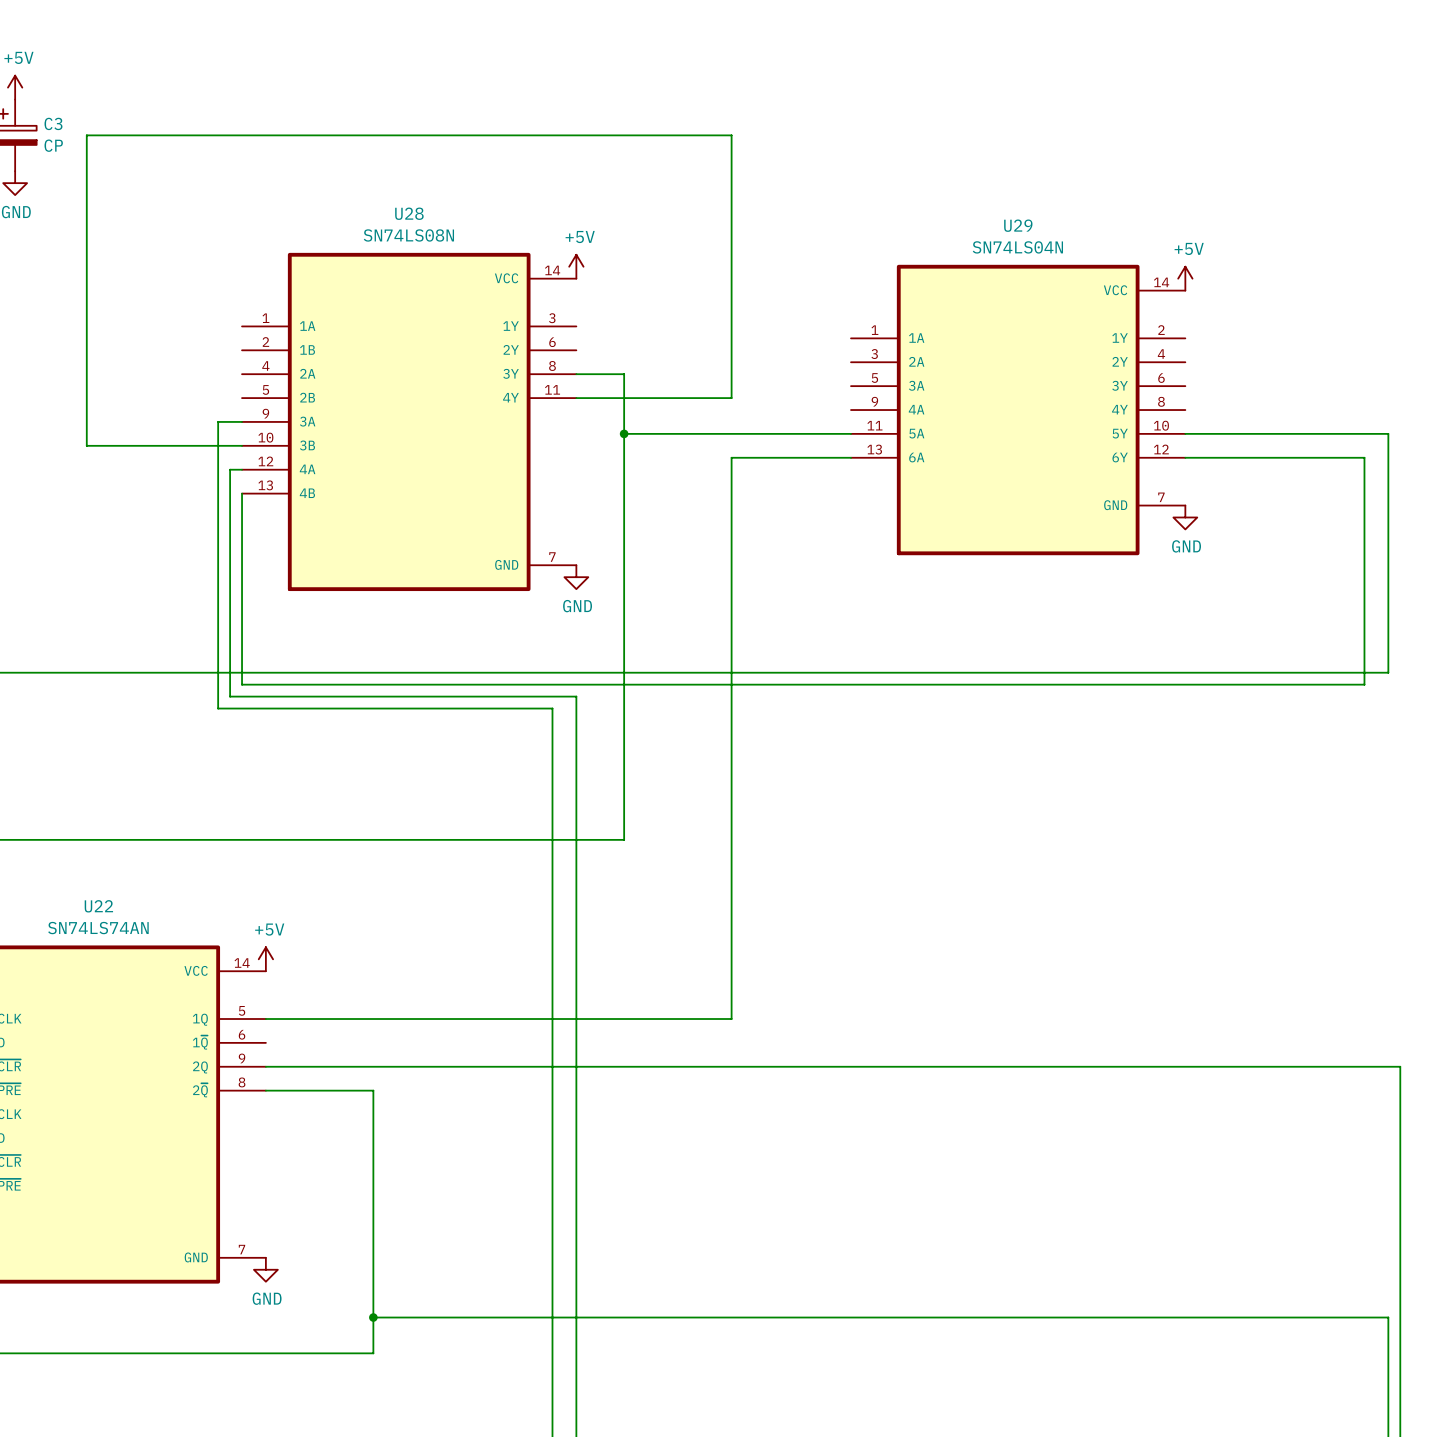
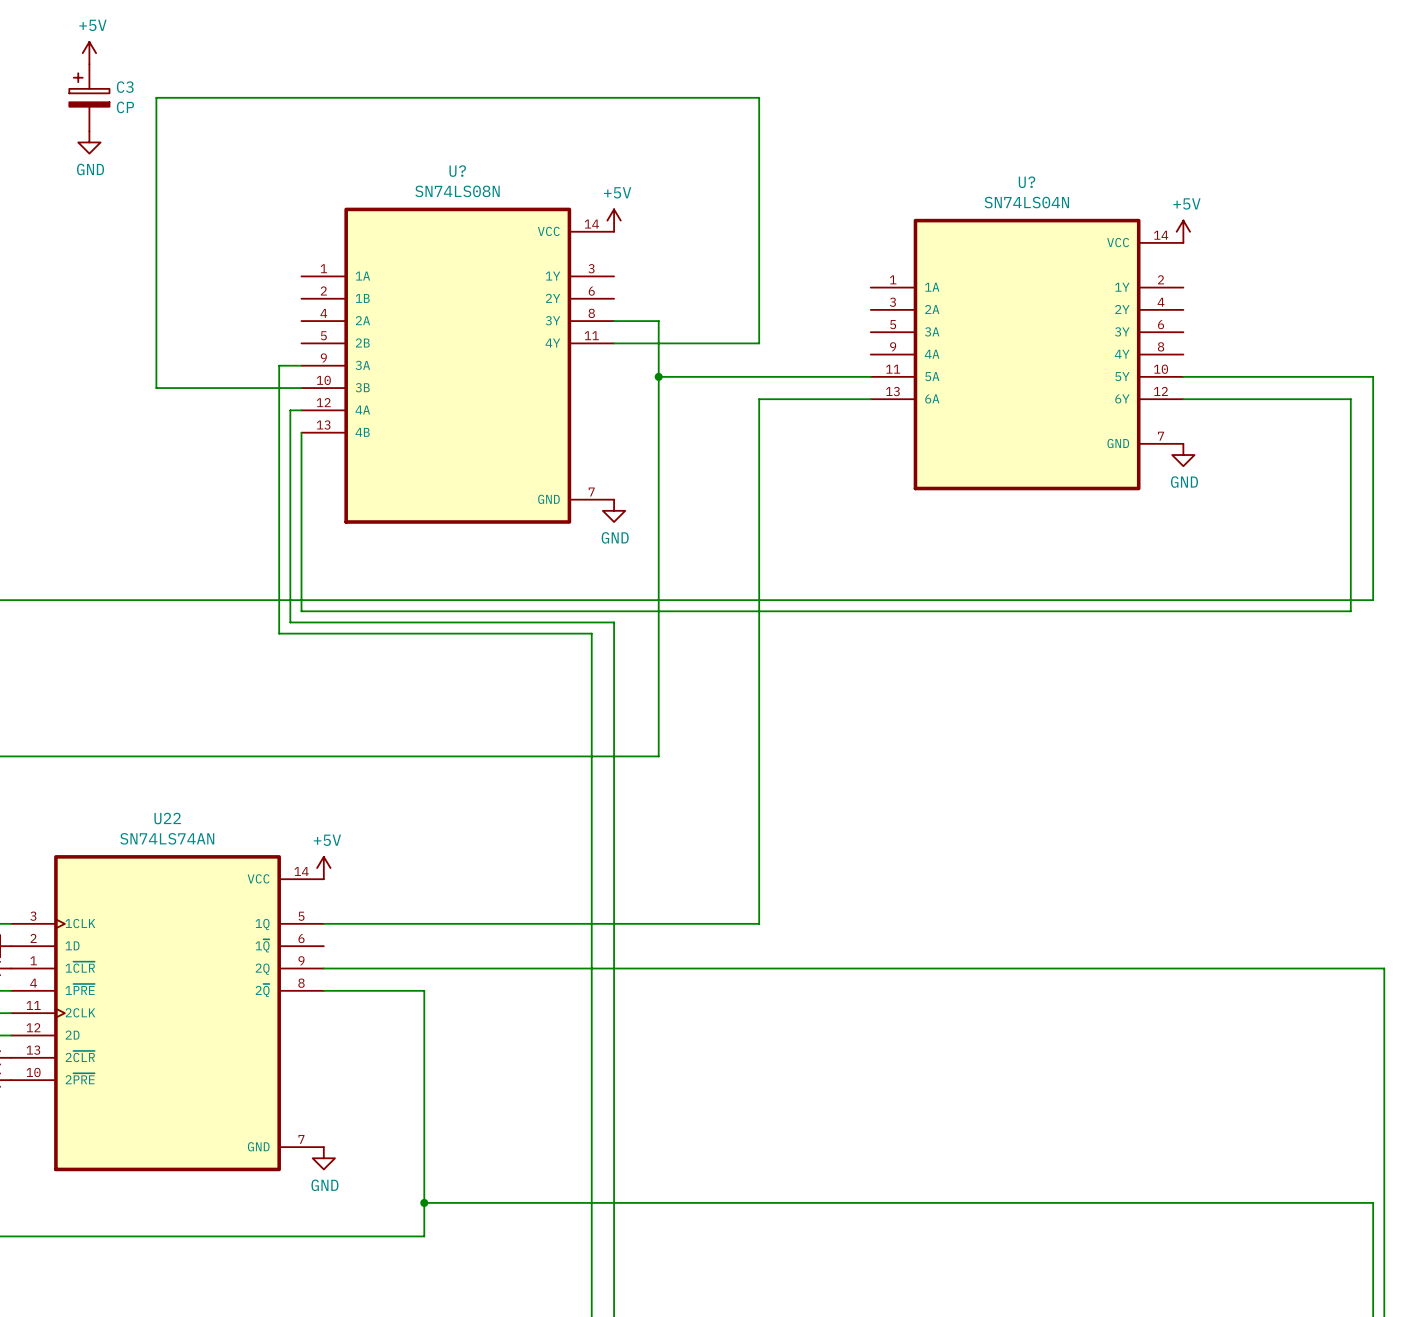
U28 name: U28 (409, 213) -> U? (457, 171)
U29 name: U29 (1018, 225) -> U? (1027, 182)

